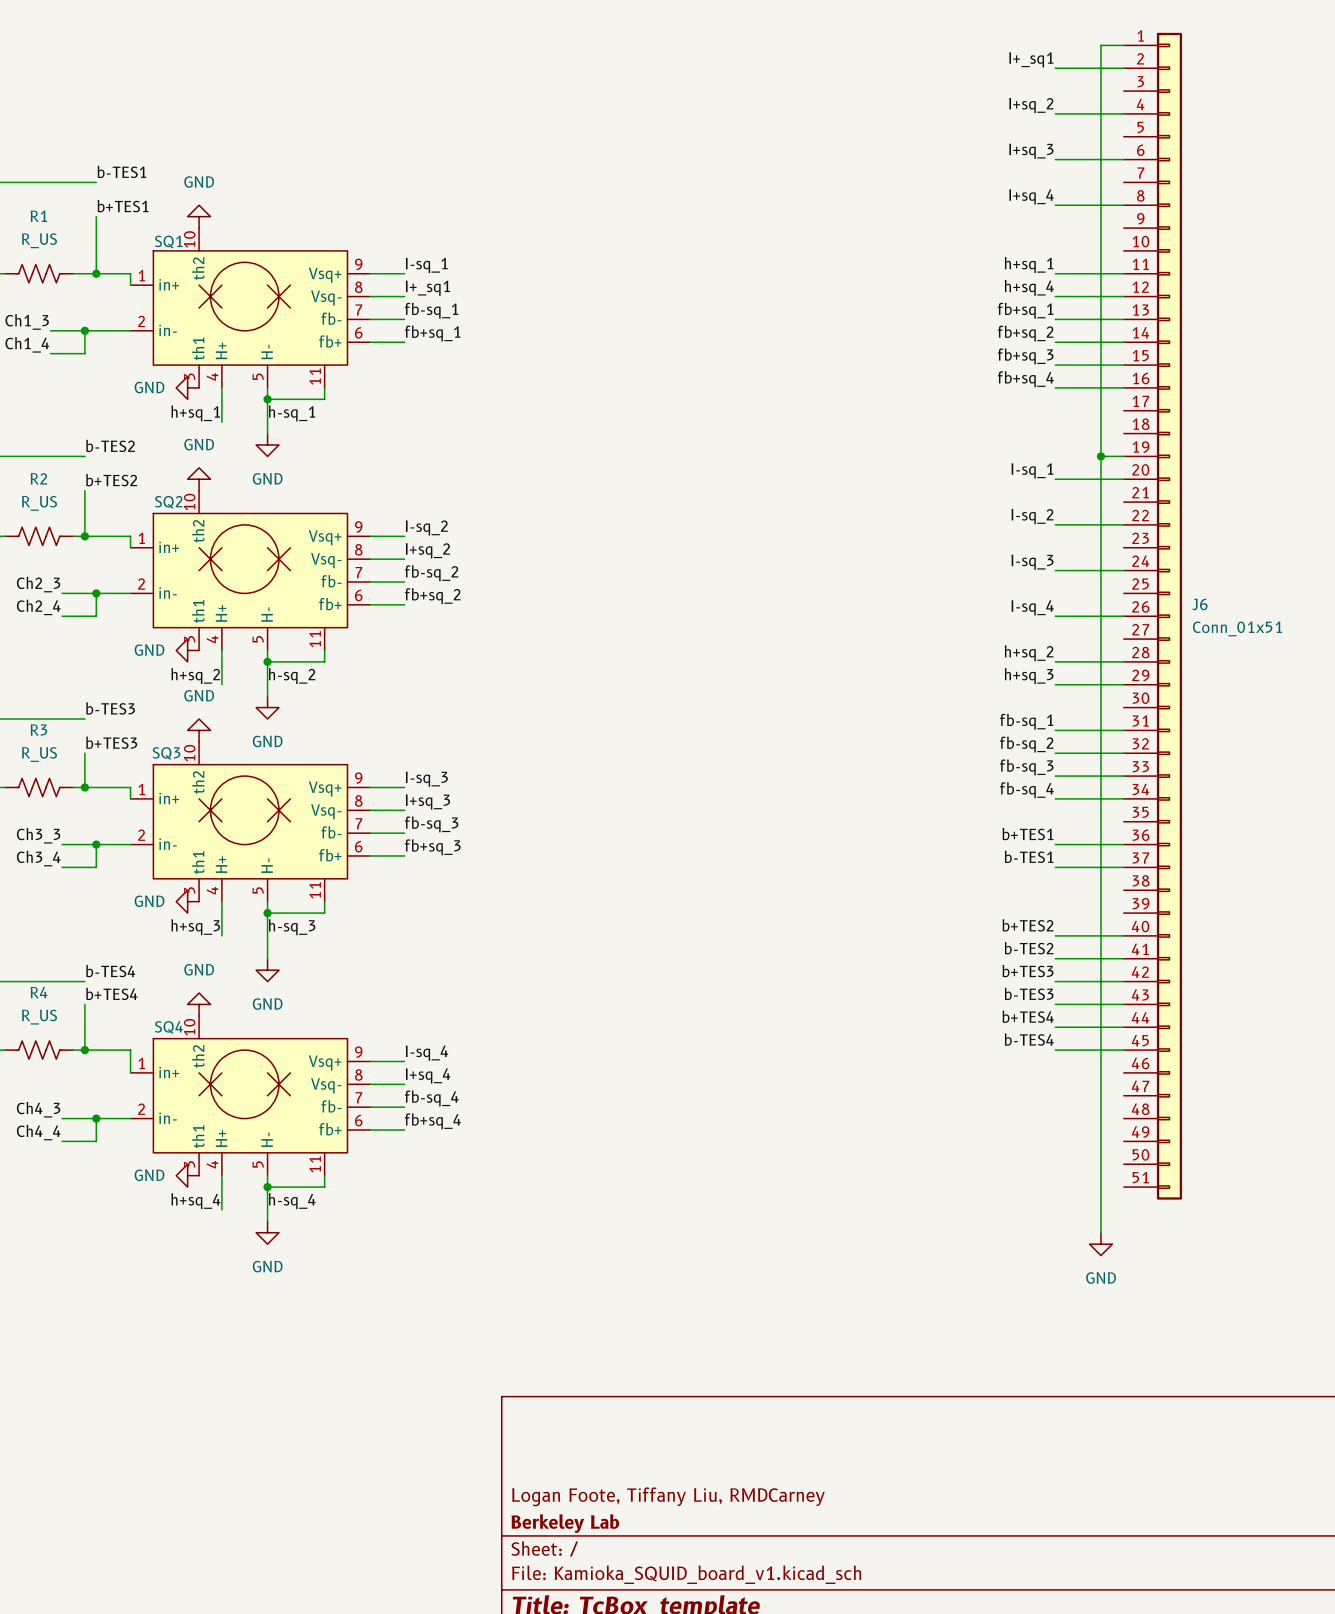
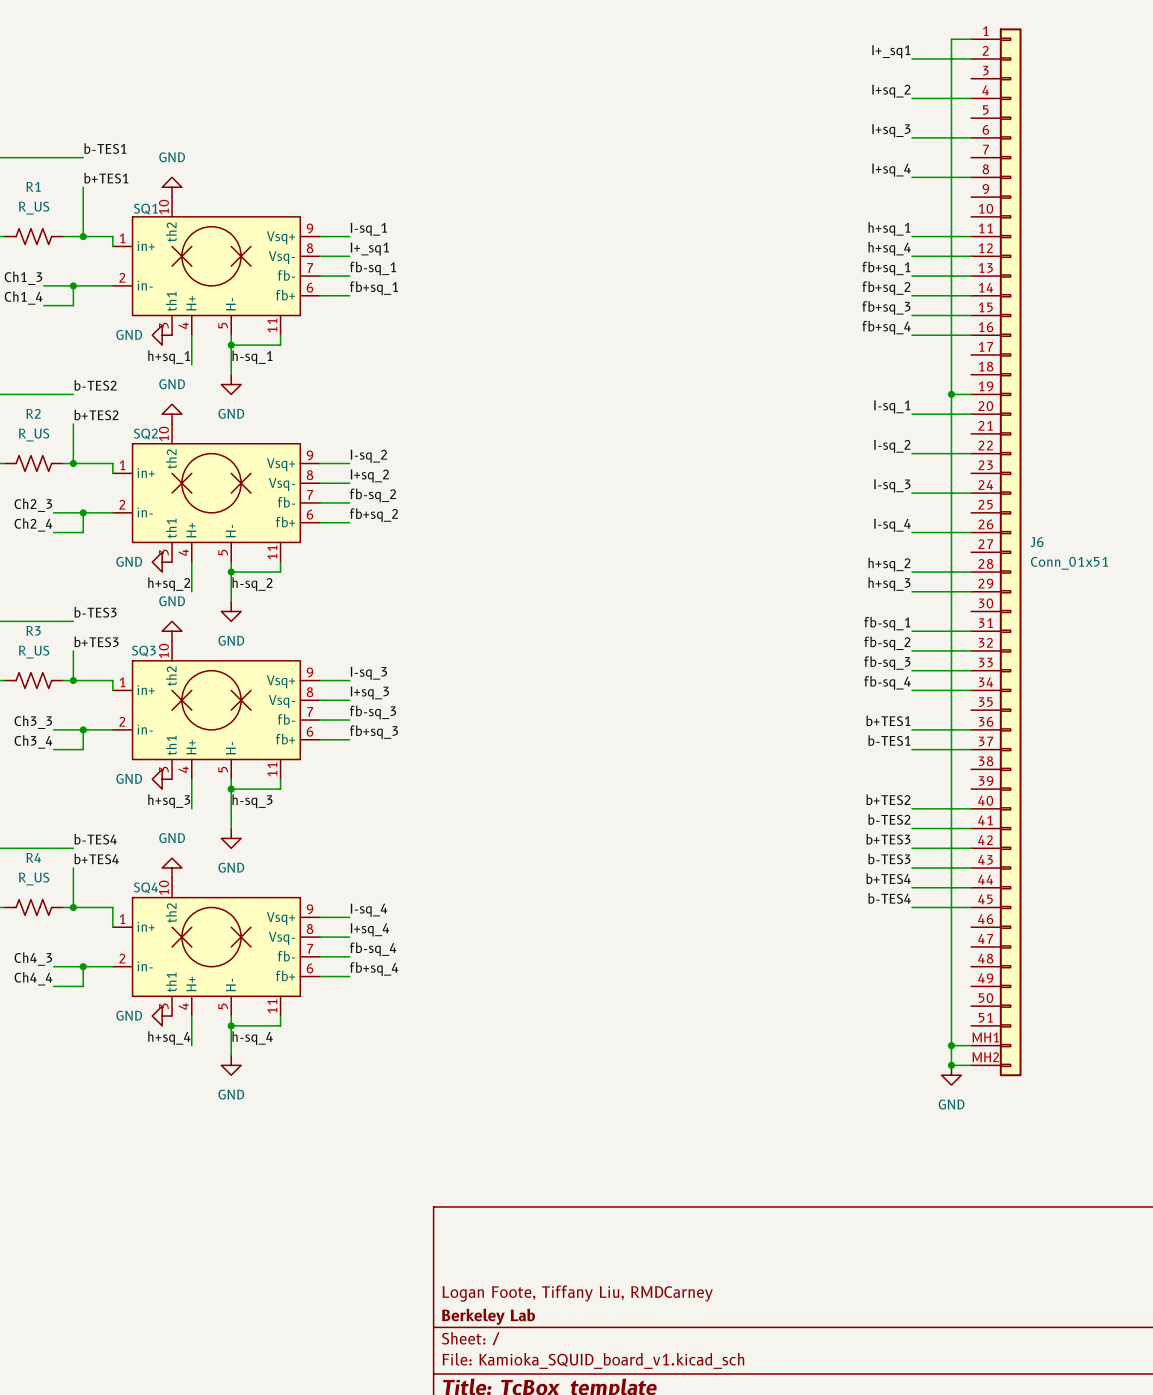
J6 symbol: [1123, 32, 1183, 1200] -> [971, 28, 1022, 1077]
wire: none -> (951, 1045) (971, 1045)
junction: none -> (951, 1045)
wire: none -> (951, 1065) (971, 1065)
junction: none -> (951, 1065)

